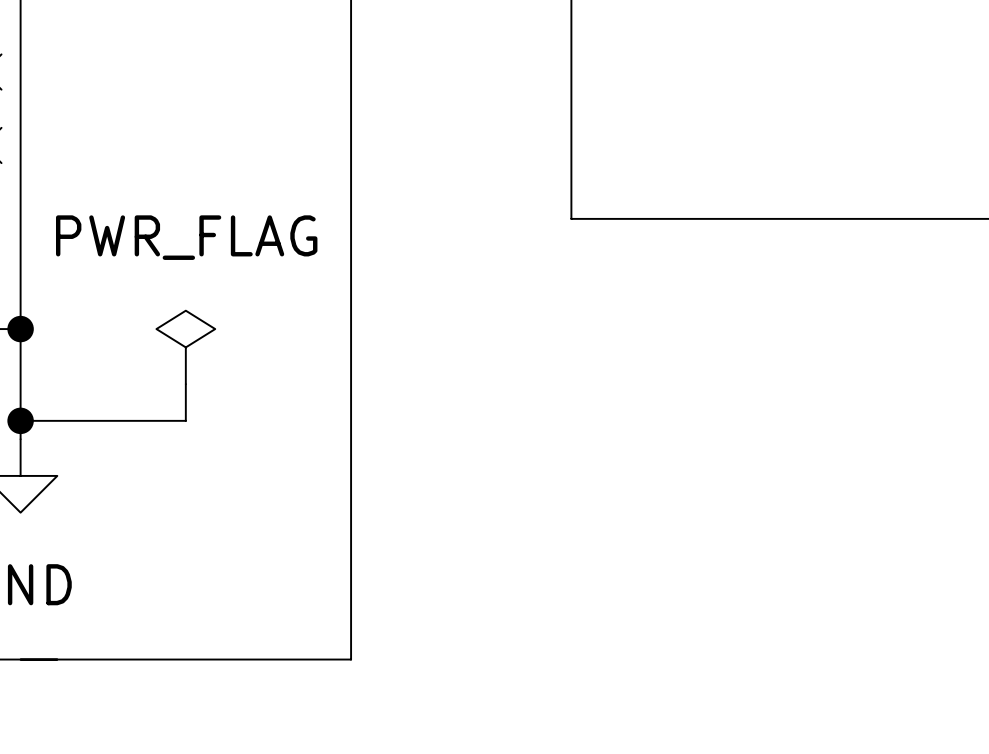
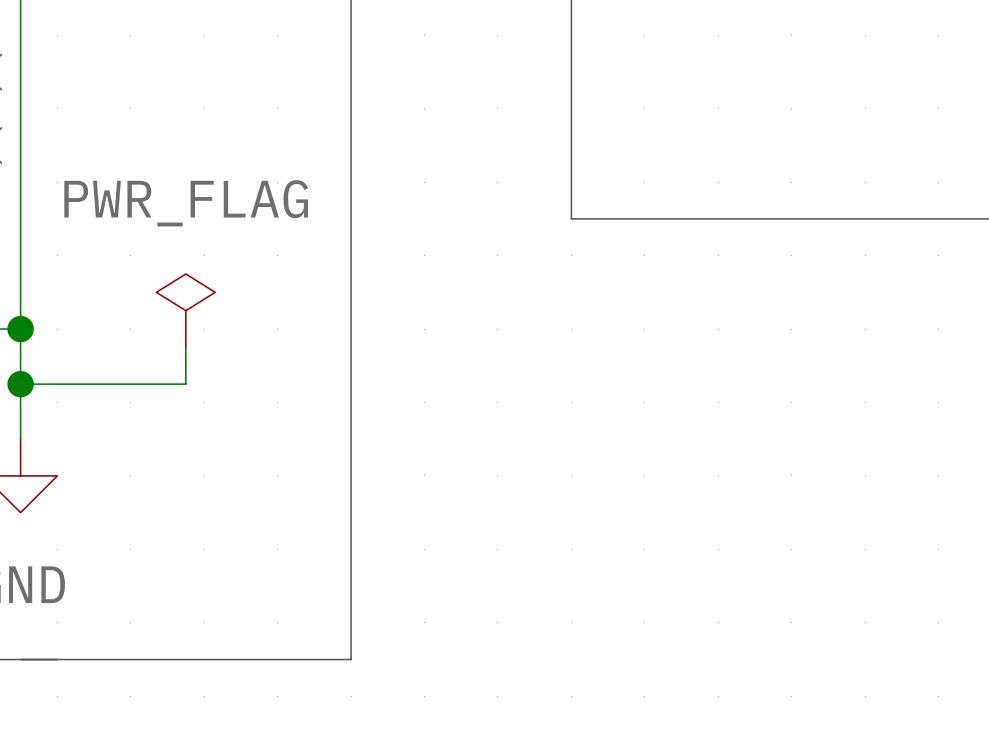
power symbol position: PWR_FLAG (185, 347) -> PWR_FLAG (185, 310)
wire: (185, 384) (185, 420) (20, 420) -> (185, 347) (185, 384) (20, 384)
junction position: (20, 420) -> (20, 384)

